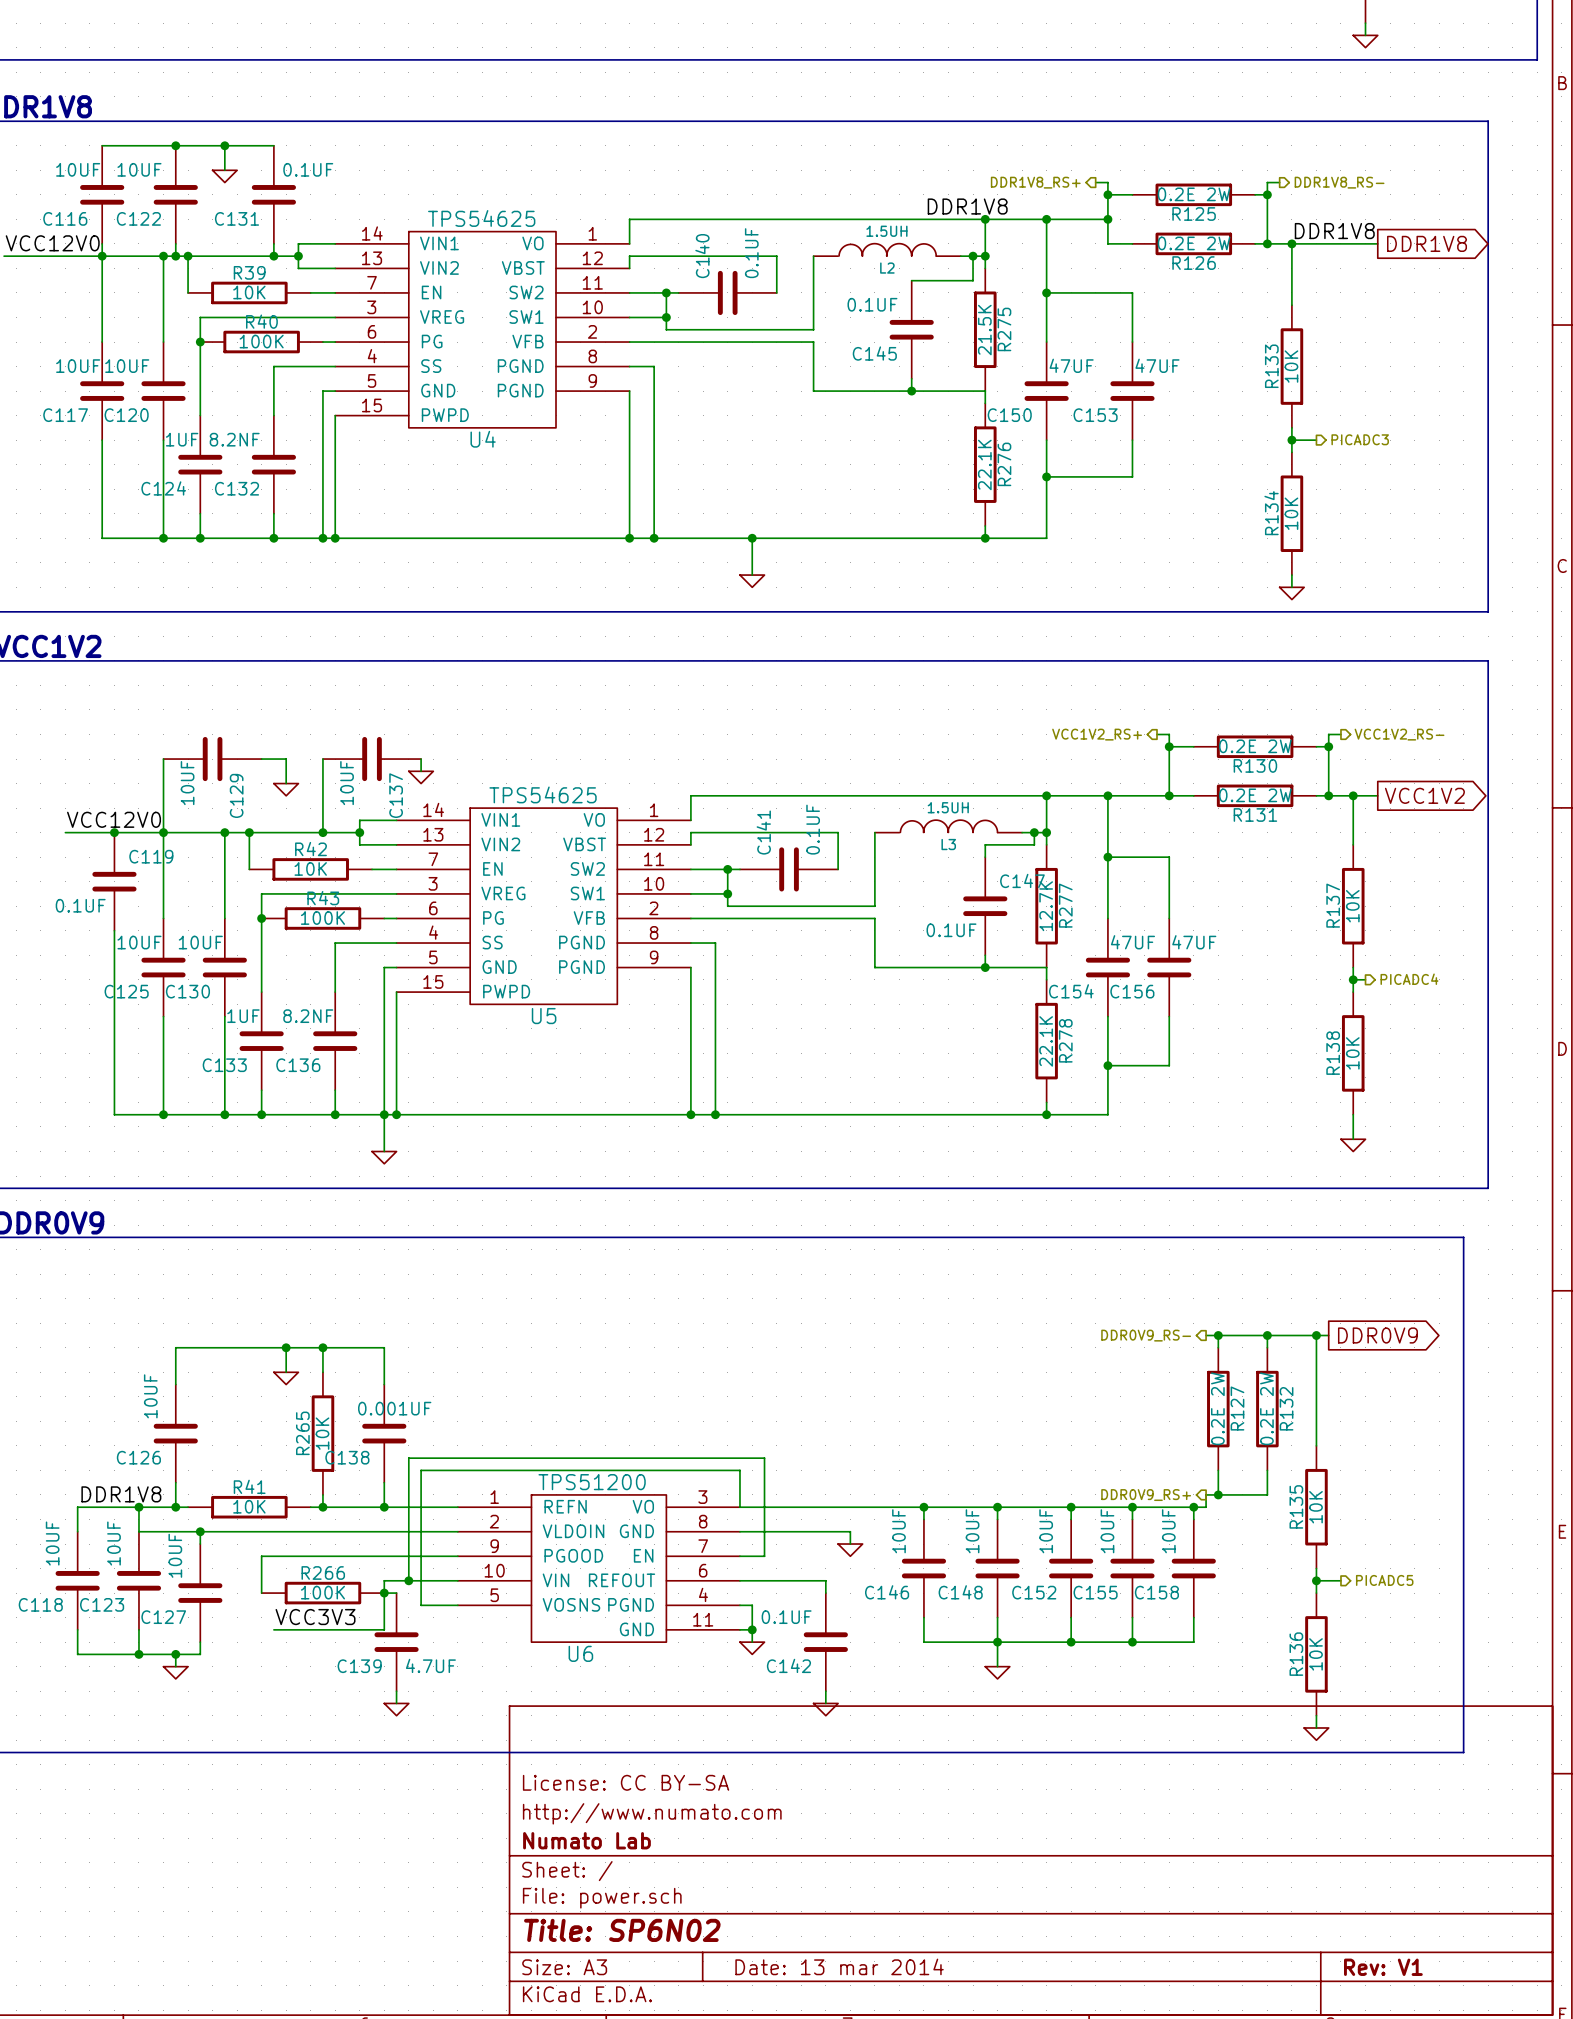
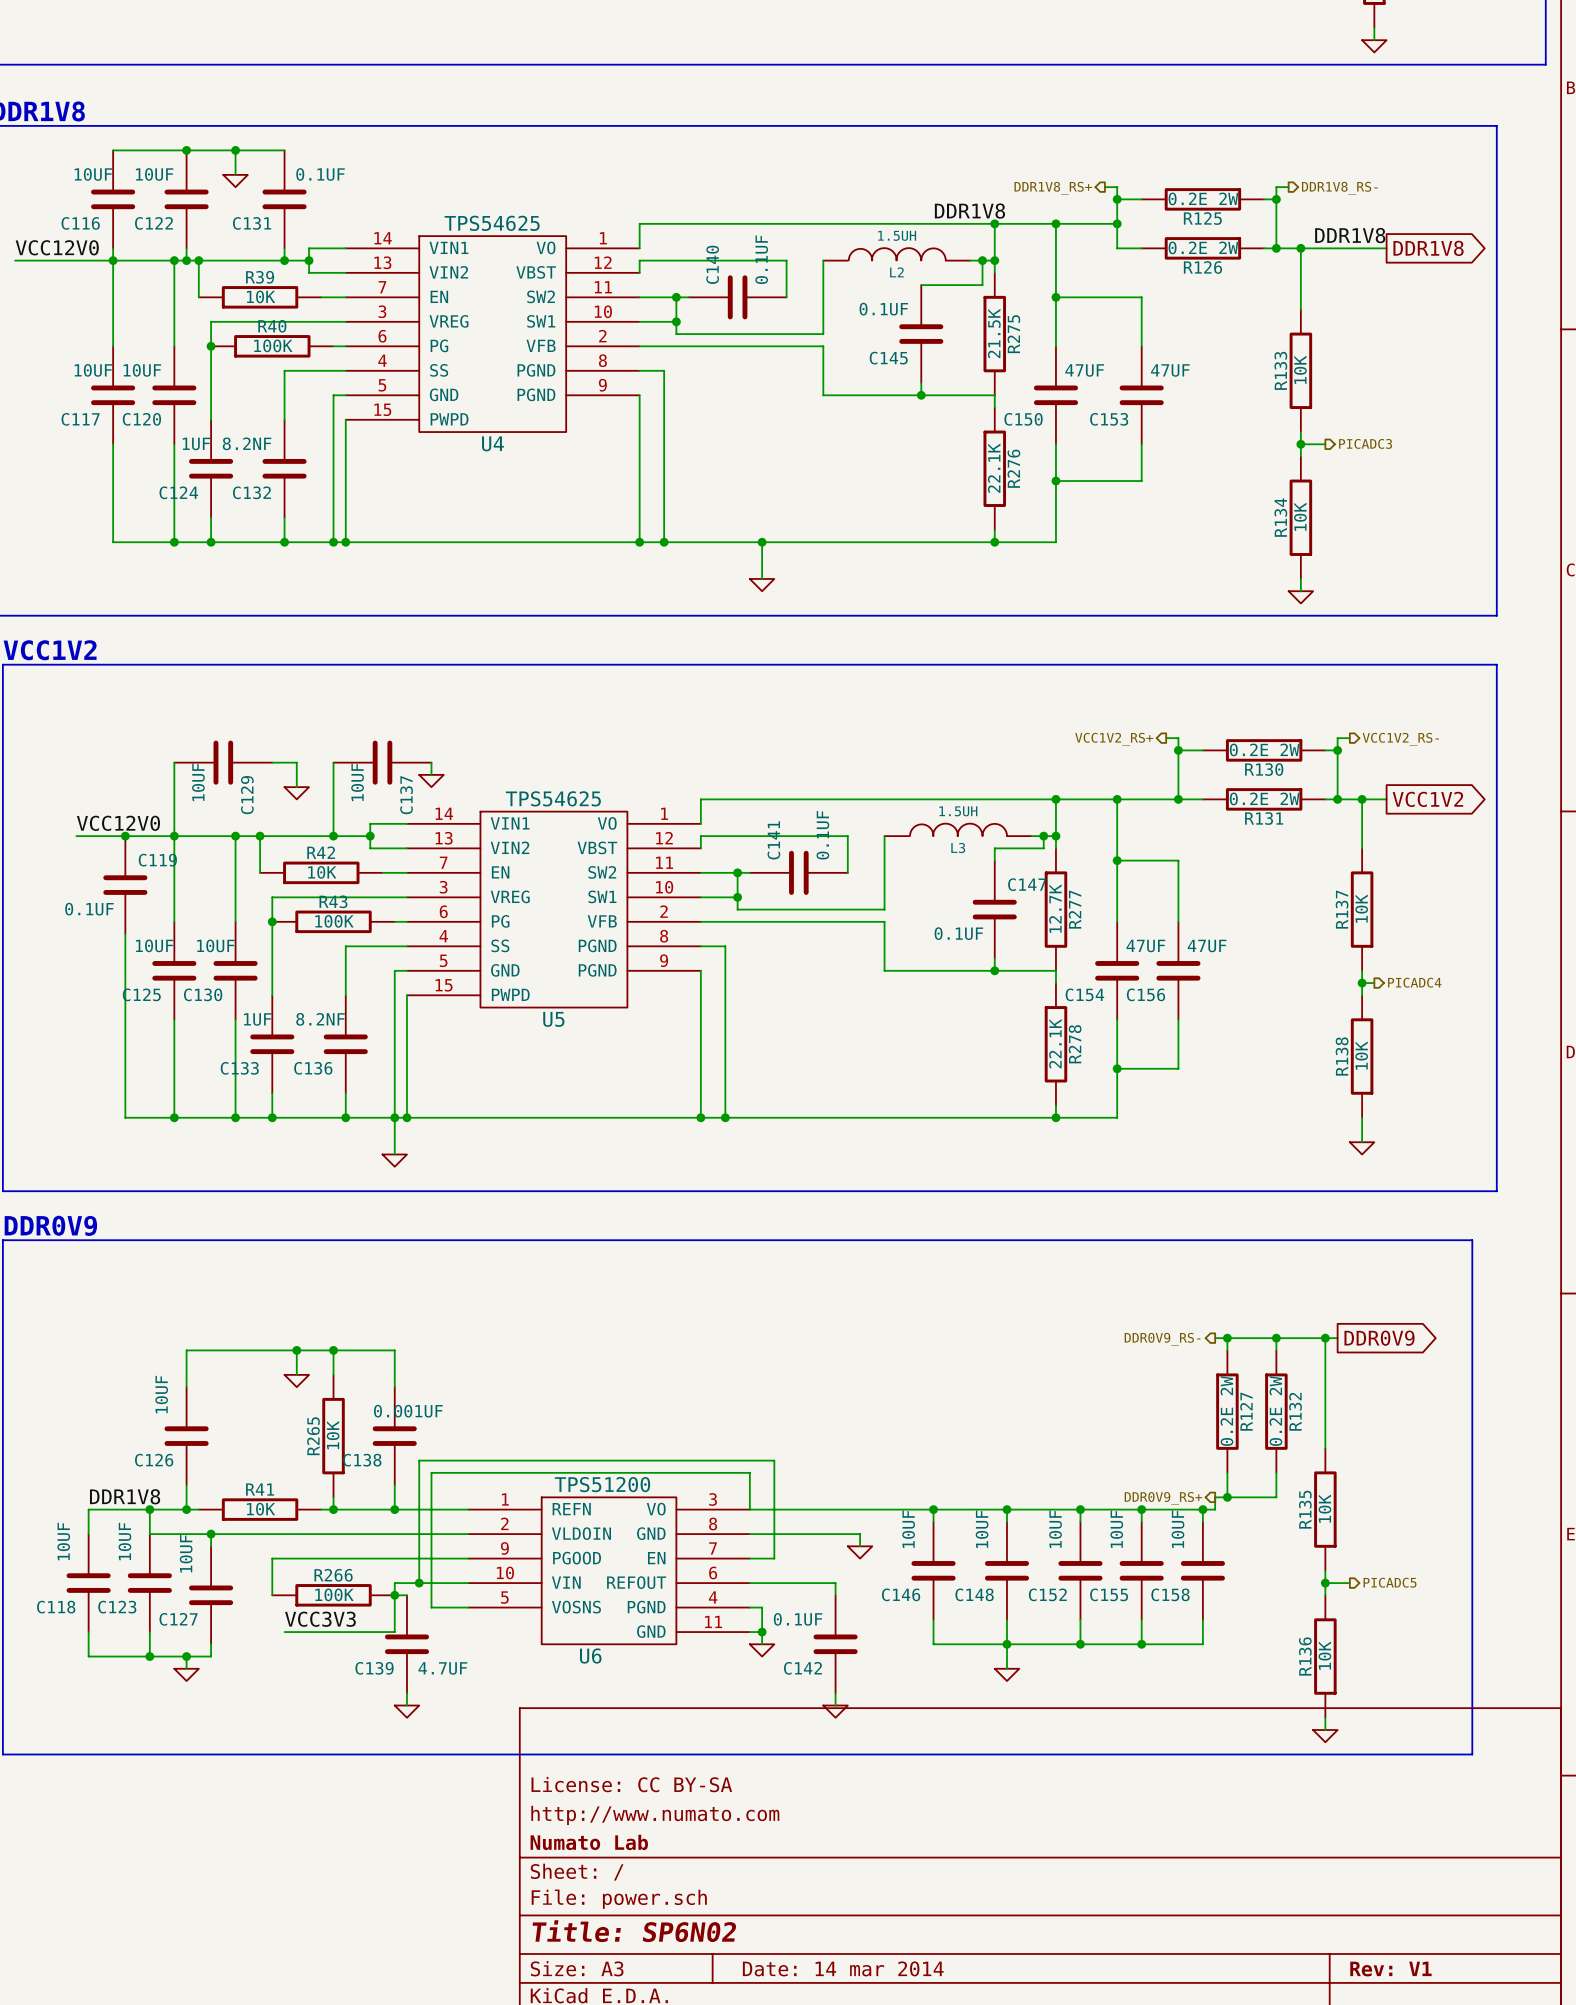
title block: Date: 13 mar 2014 (839, 1966) -> Date: 14 mar 2014 (843, 1968)

